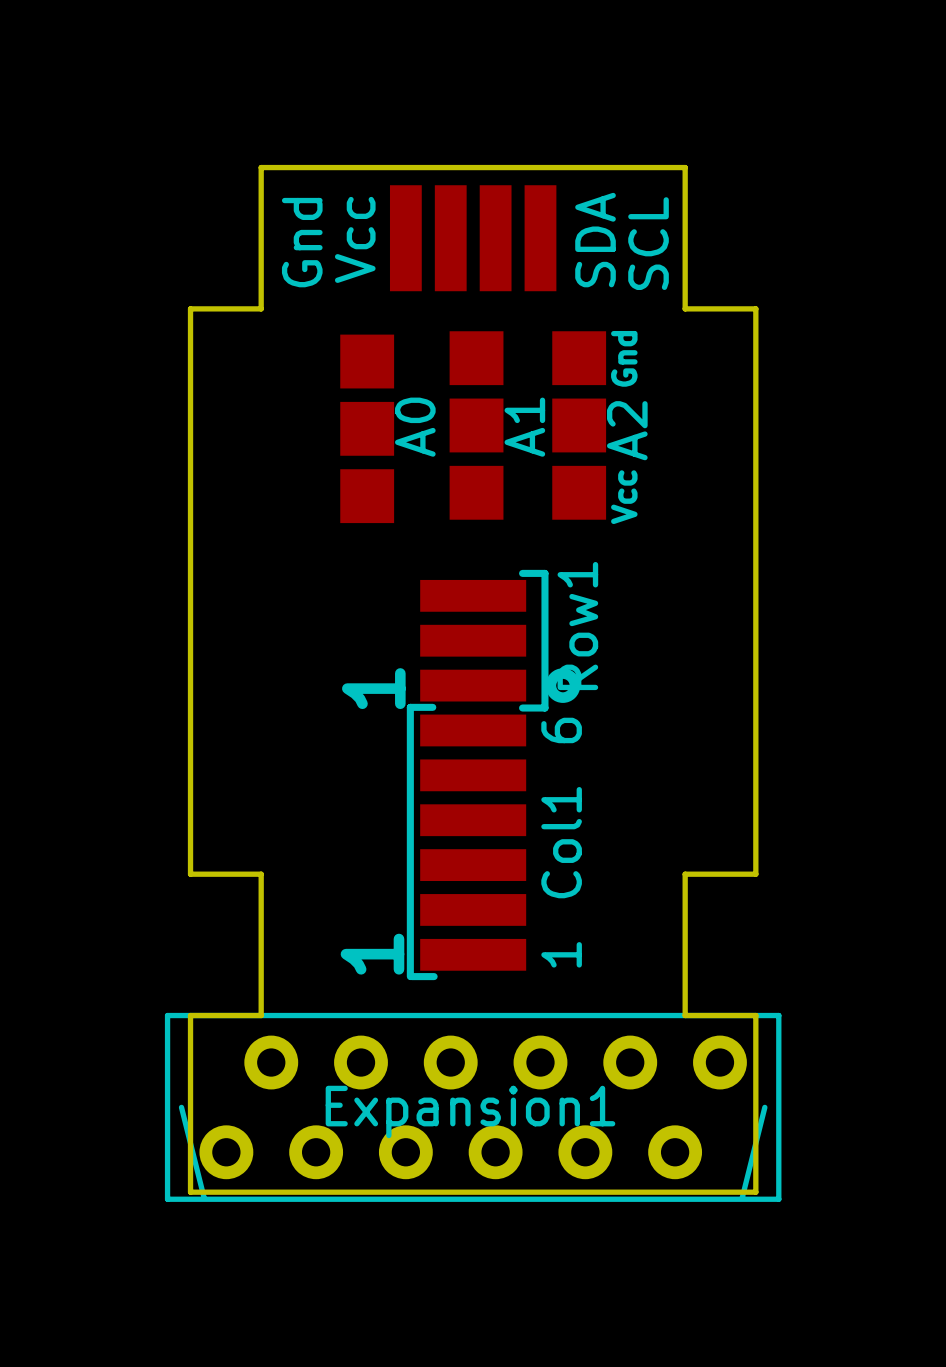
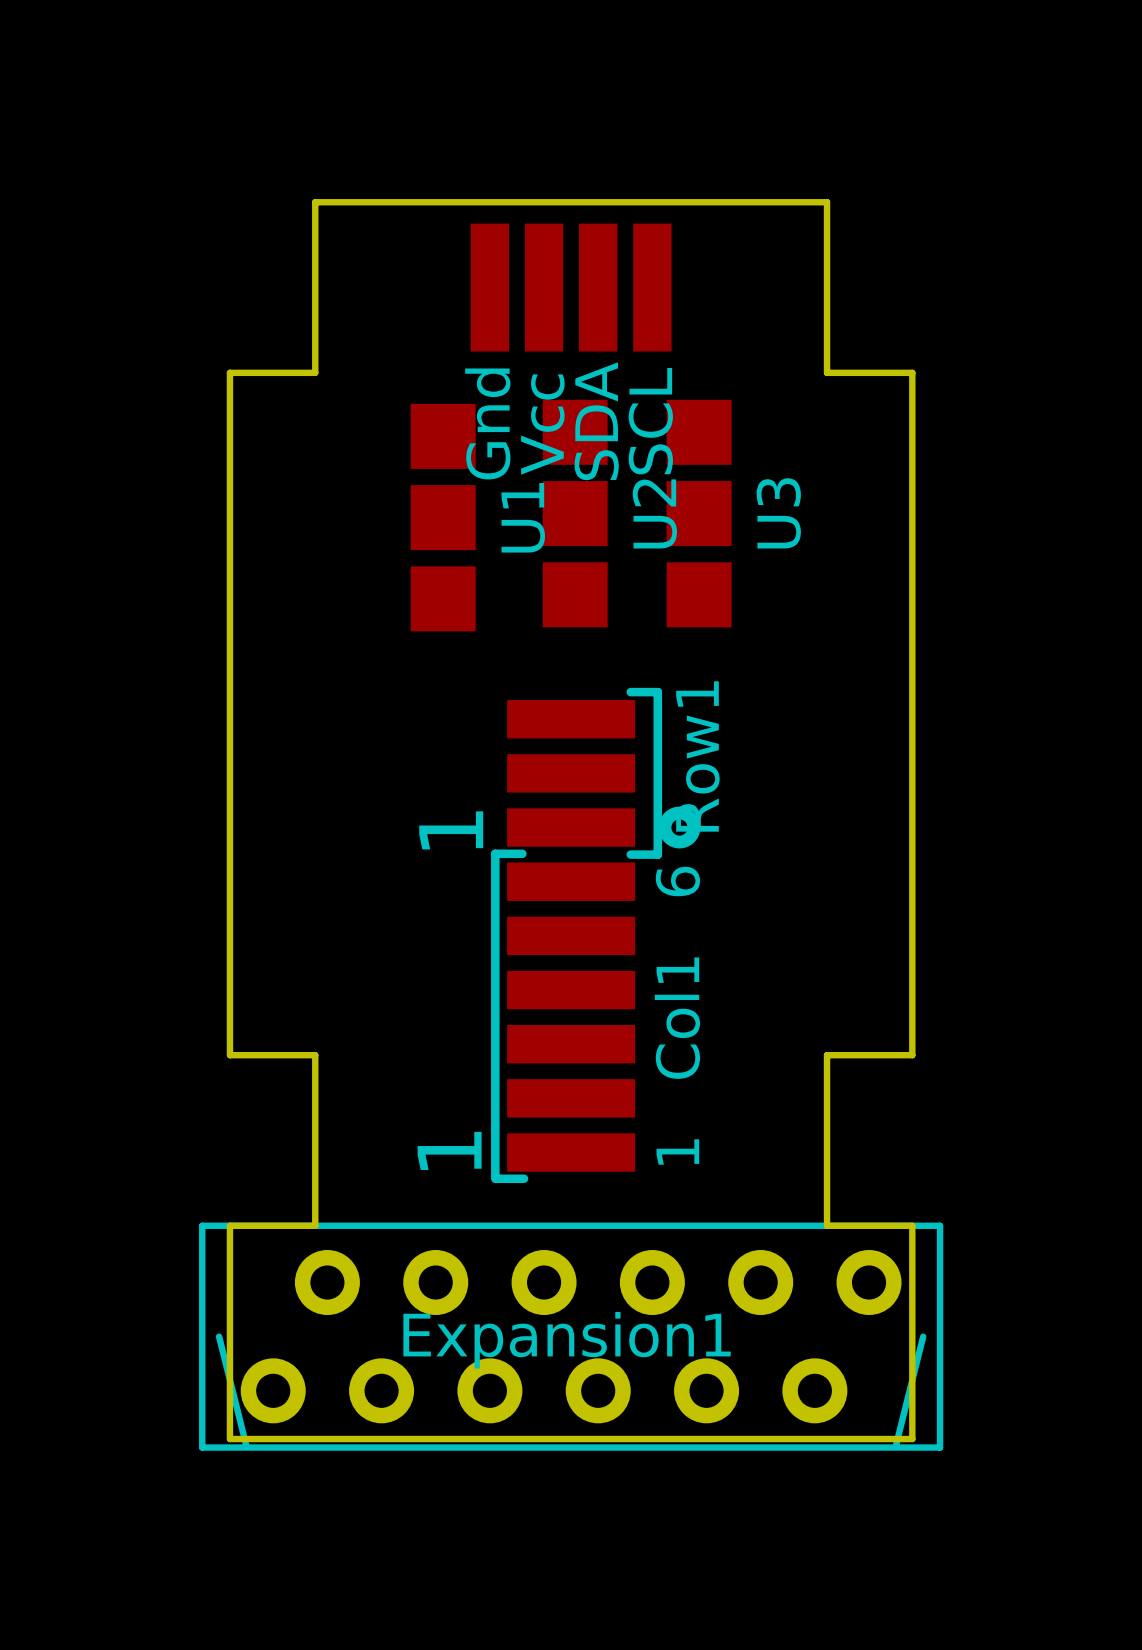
part text position: Vcc (355, 239) -> Vcc (542, 424)
part text position: SDA (595, 240) -> SDA (596, 421)
part text position: Gnd (302, 242) -> Gnd (487, 423)
part text position: SCL (648, 243) -> SCL (650, 421)
text: Gnd (624, 358) -> none
A0 name: A0 (415, 427) -> U1 (523, 517)
A1 name: A1 (524, 427) -> U2 (654, 513)
A2 name: A2 (627, 430) -> U3 (778, 513)
text: Vcc (624, 497) -> none

